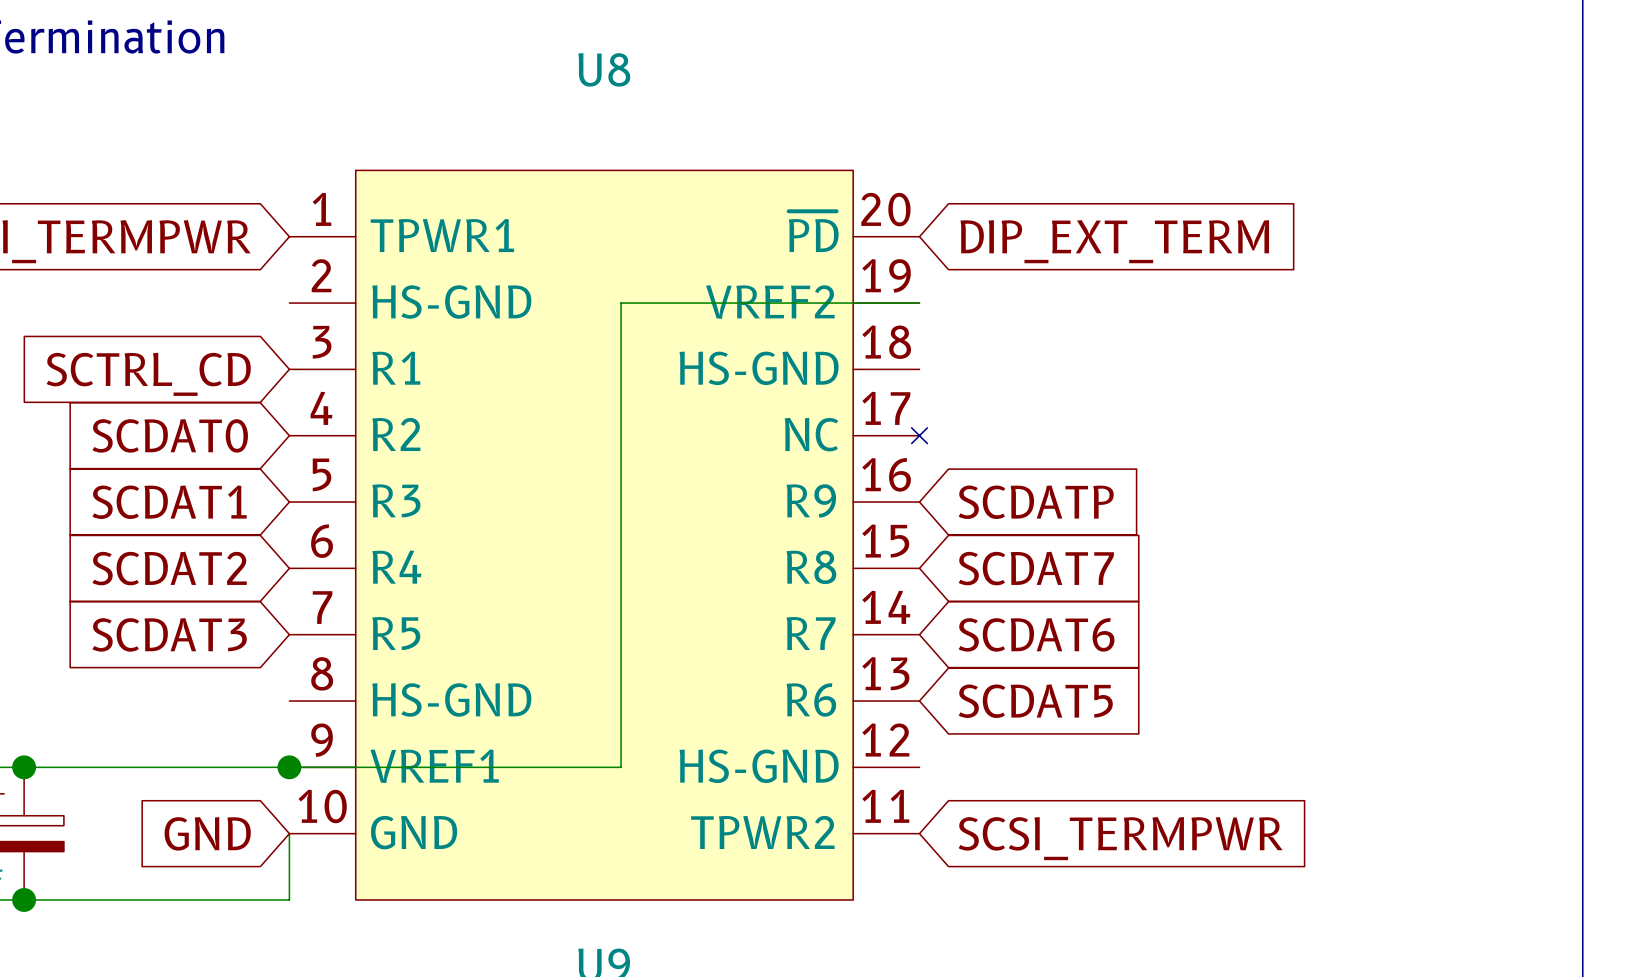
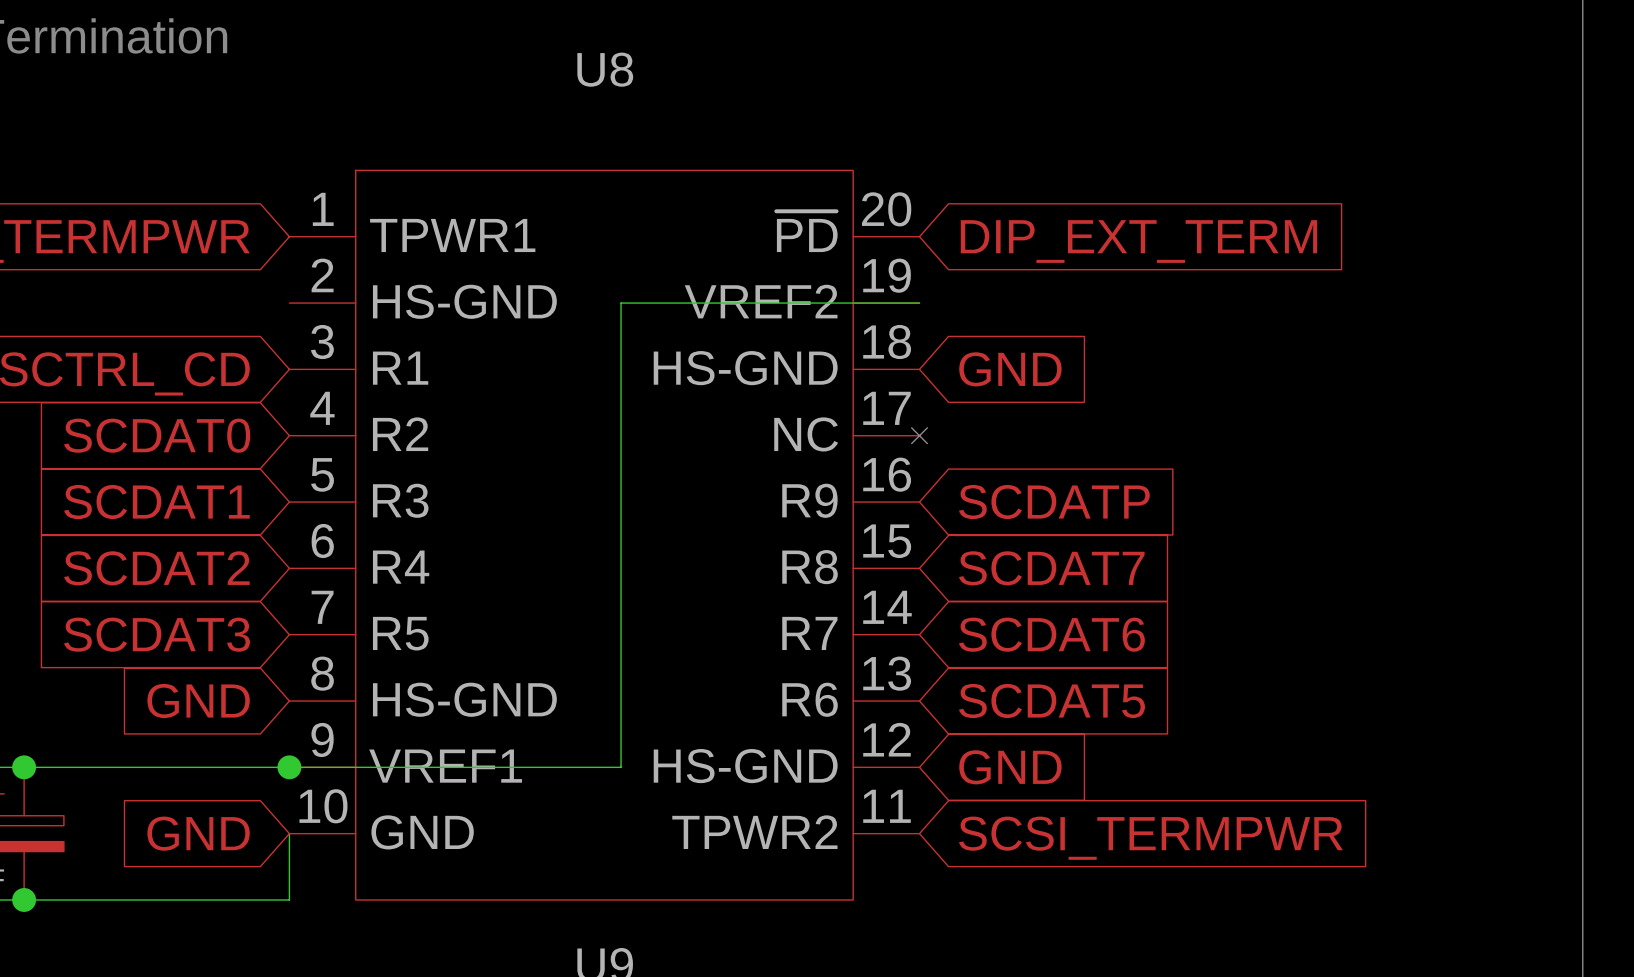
global label: none -> GND (1010, 369)
global label: none -> GND (198, 700)
global label: none -> GND (1010, 767)

